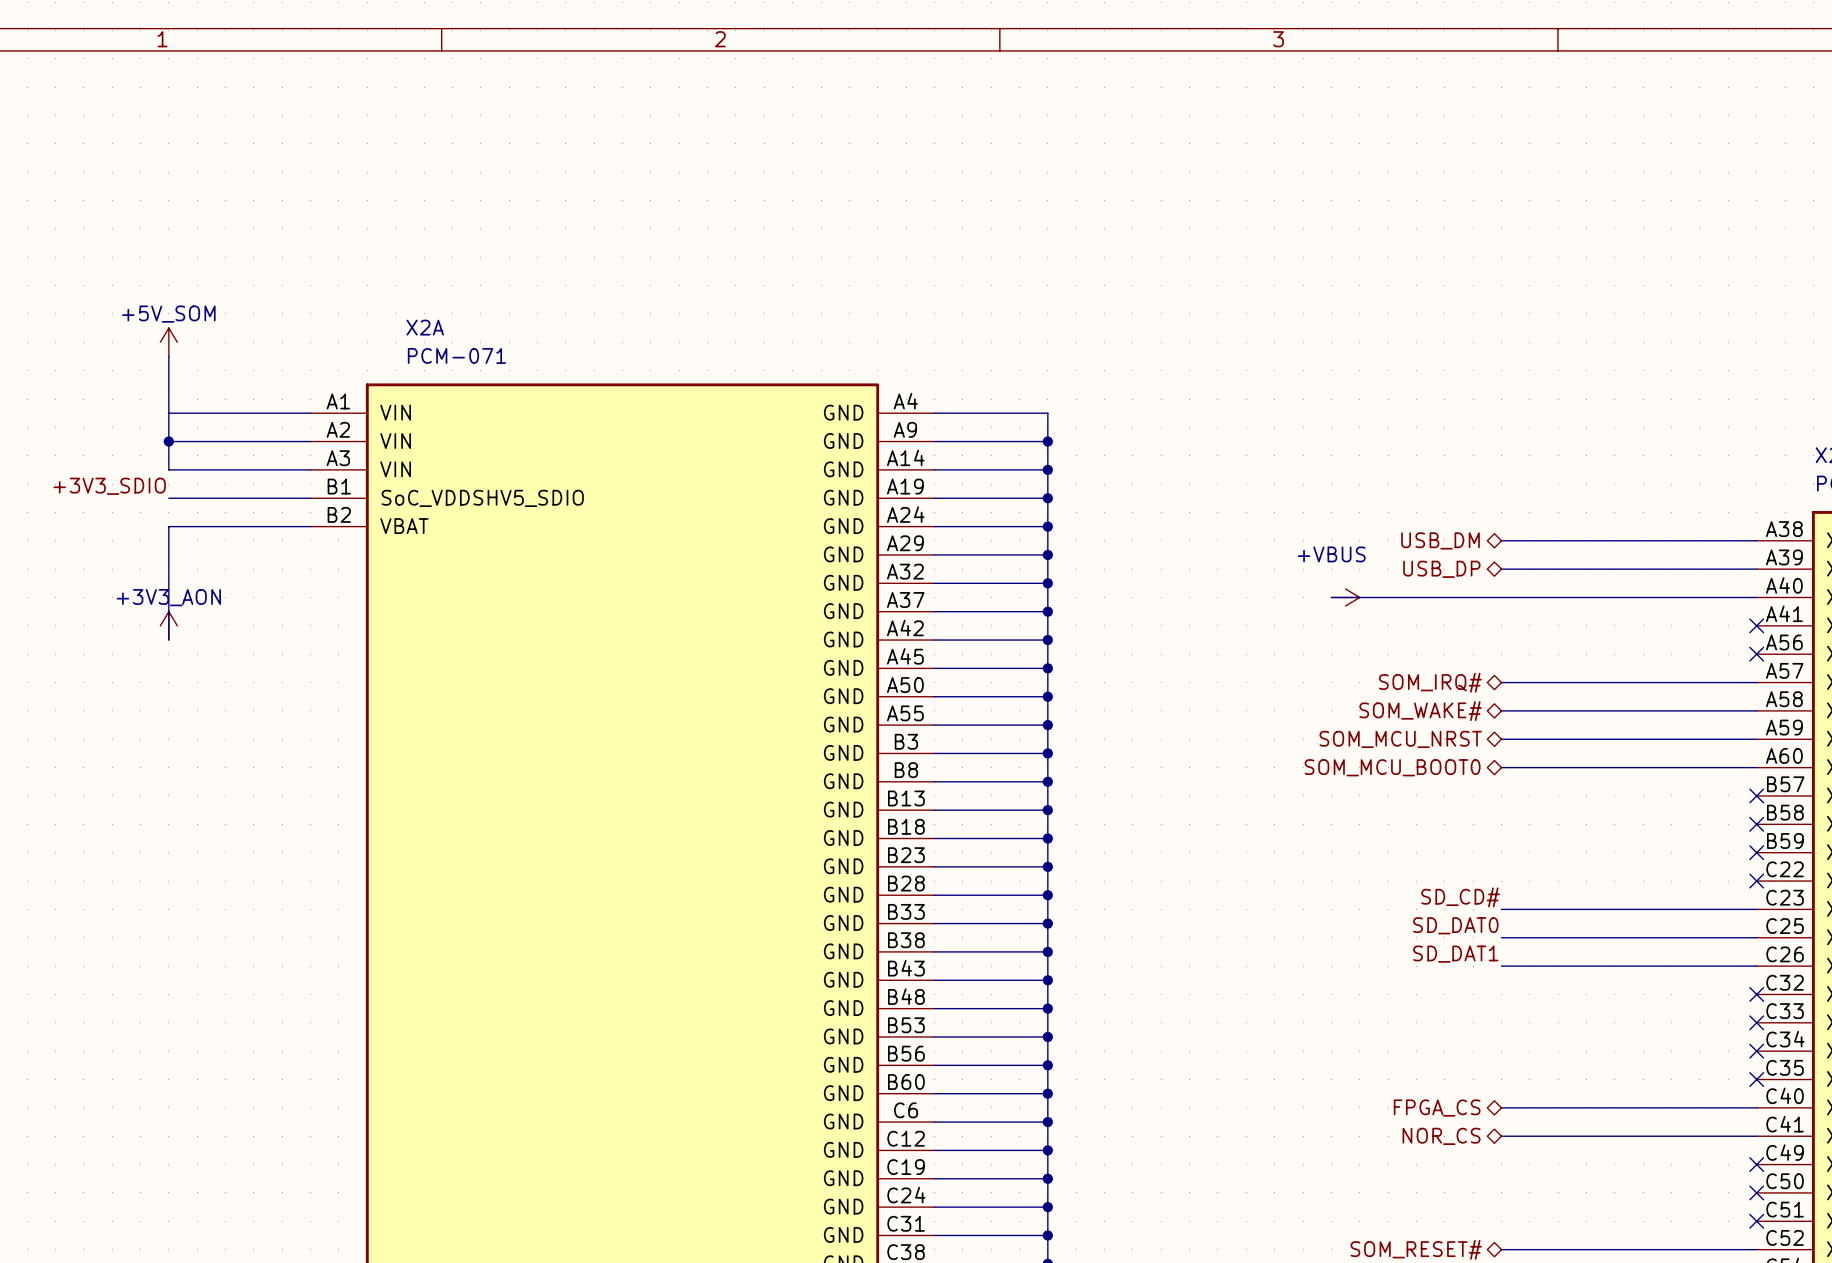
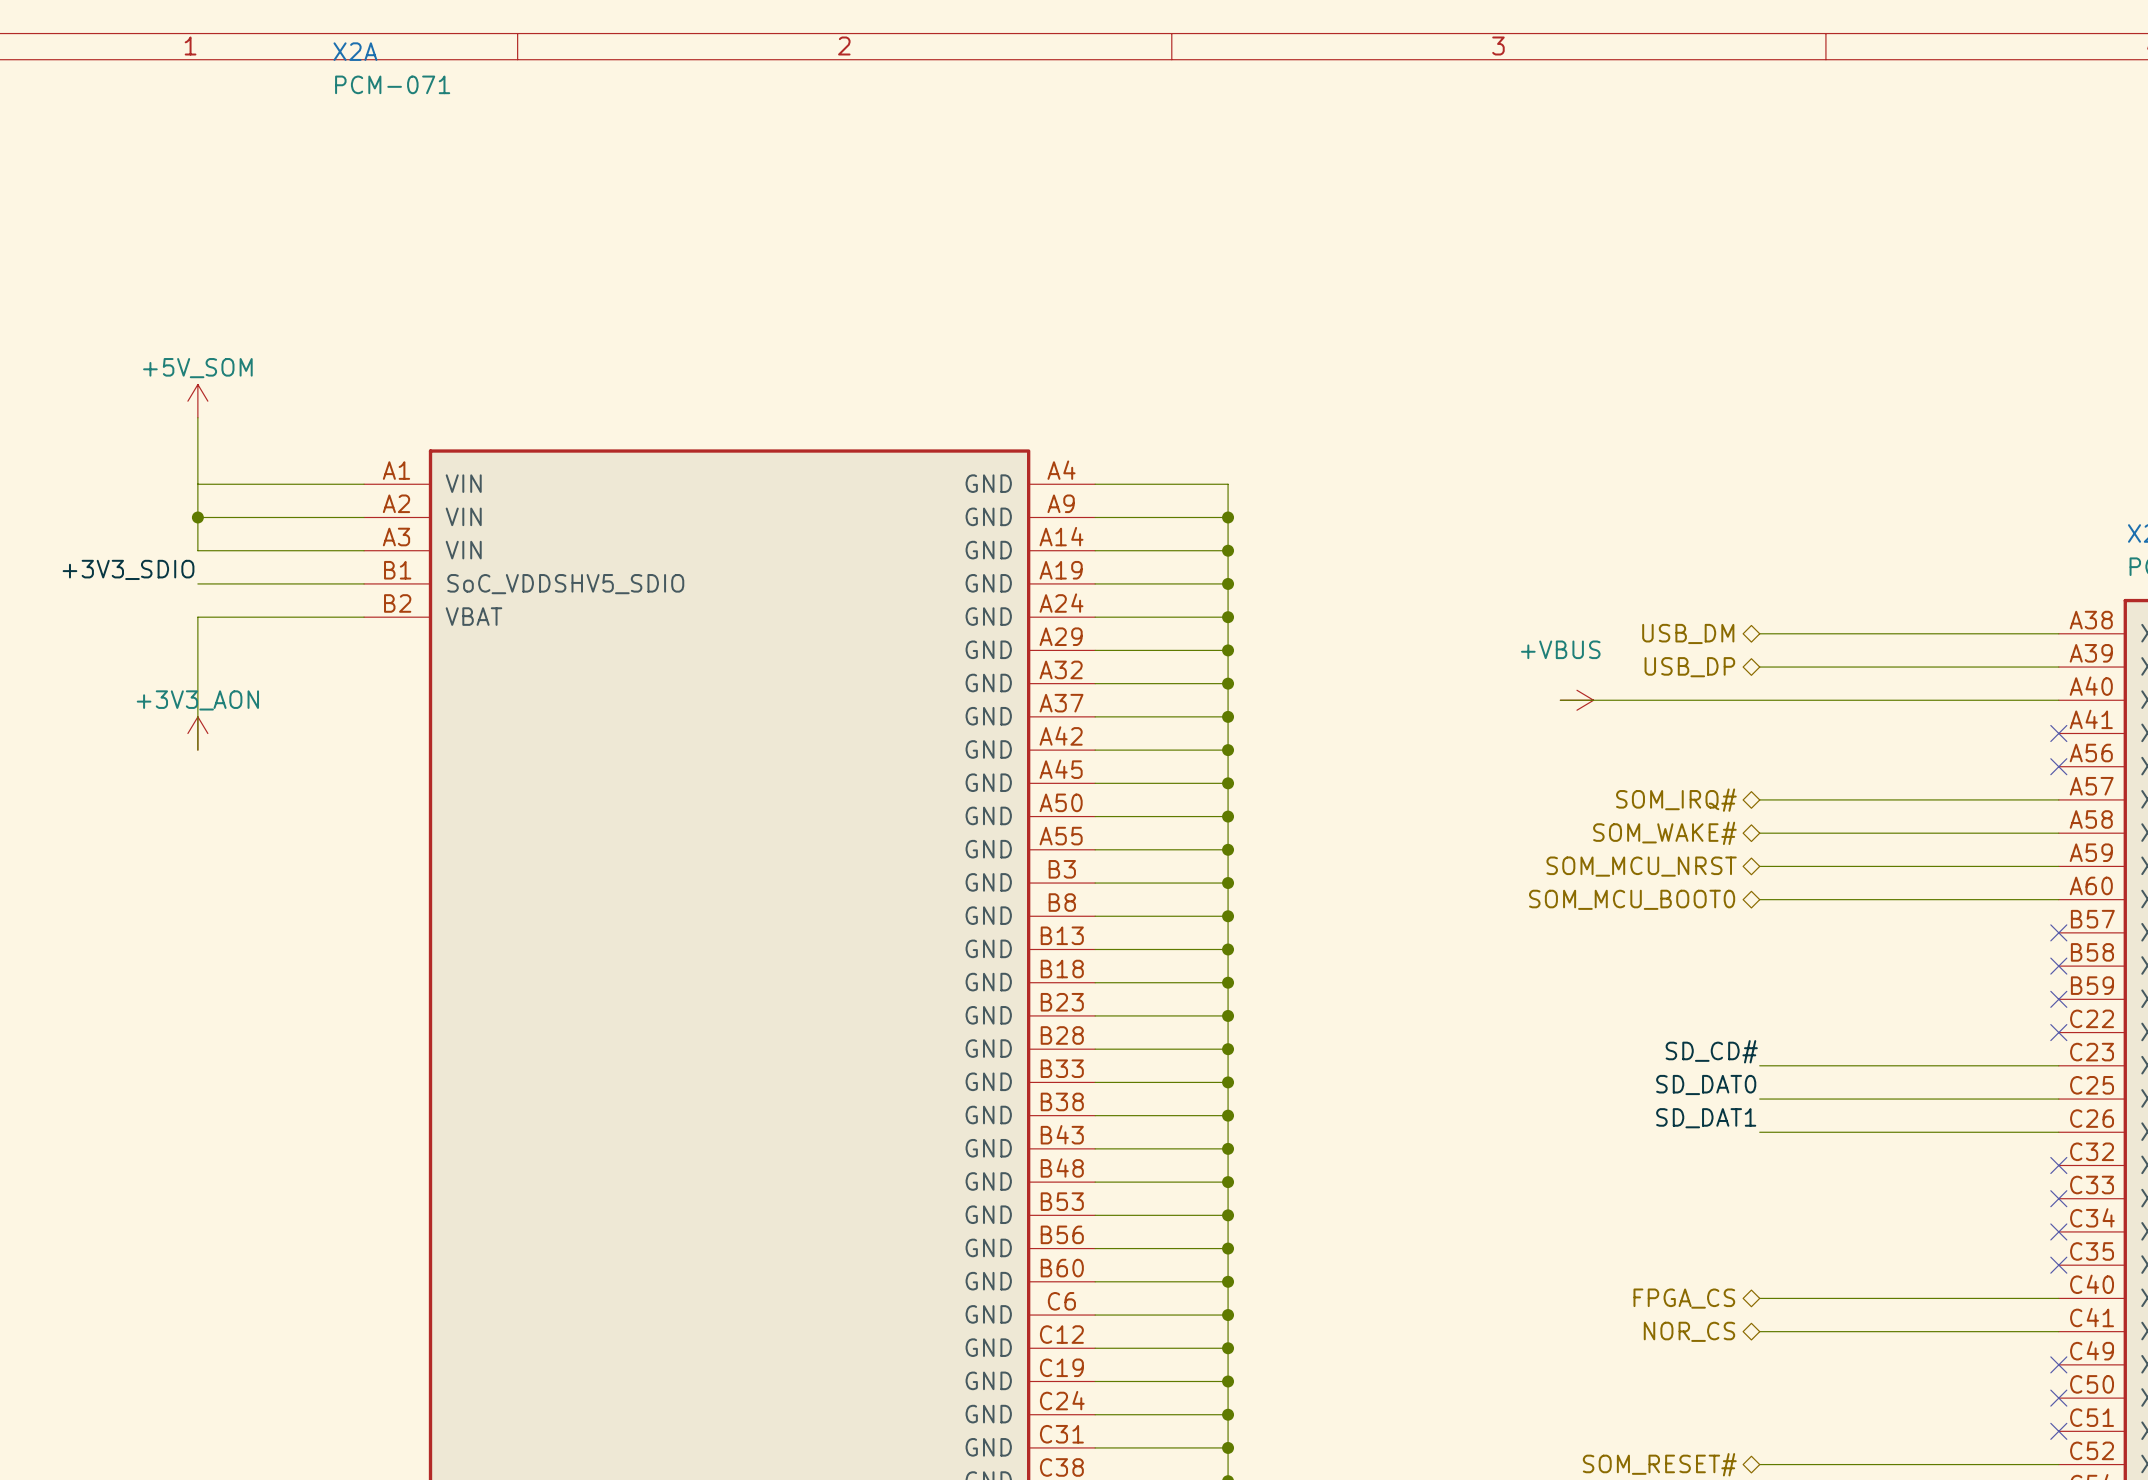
X2A name position: X2A (425, 327) -> X2A (355, 51)
X2A value position: PCM-071 (456, 355) -> PCM-071 (392, 84)

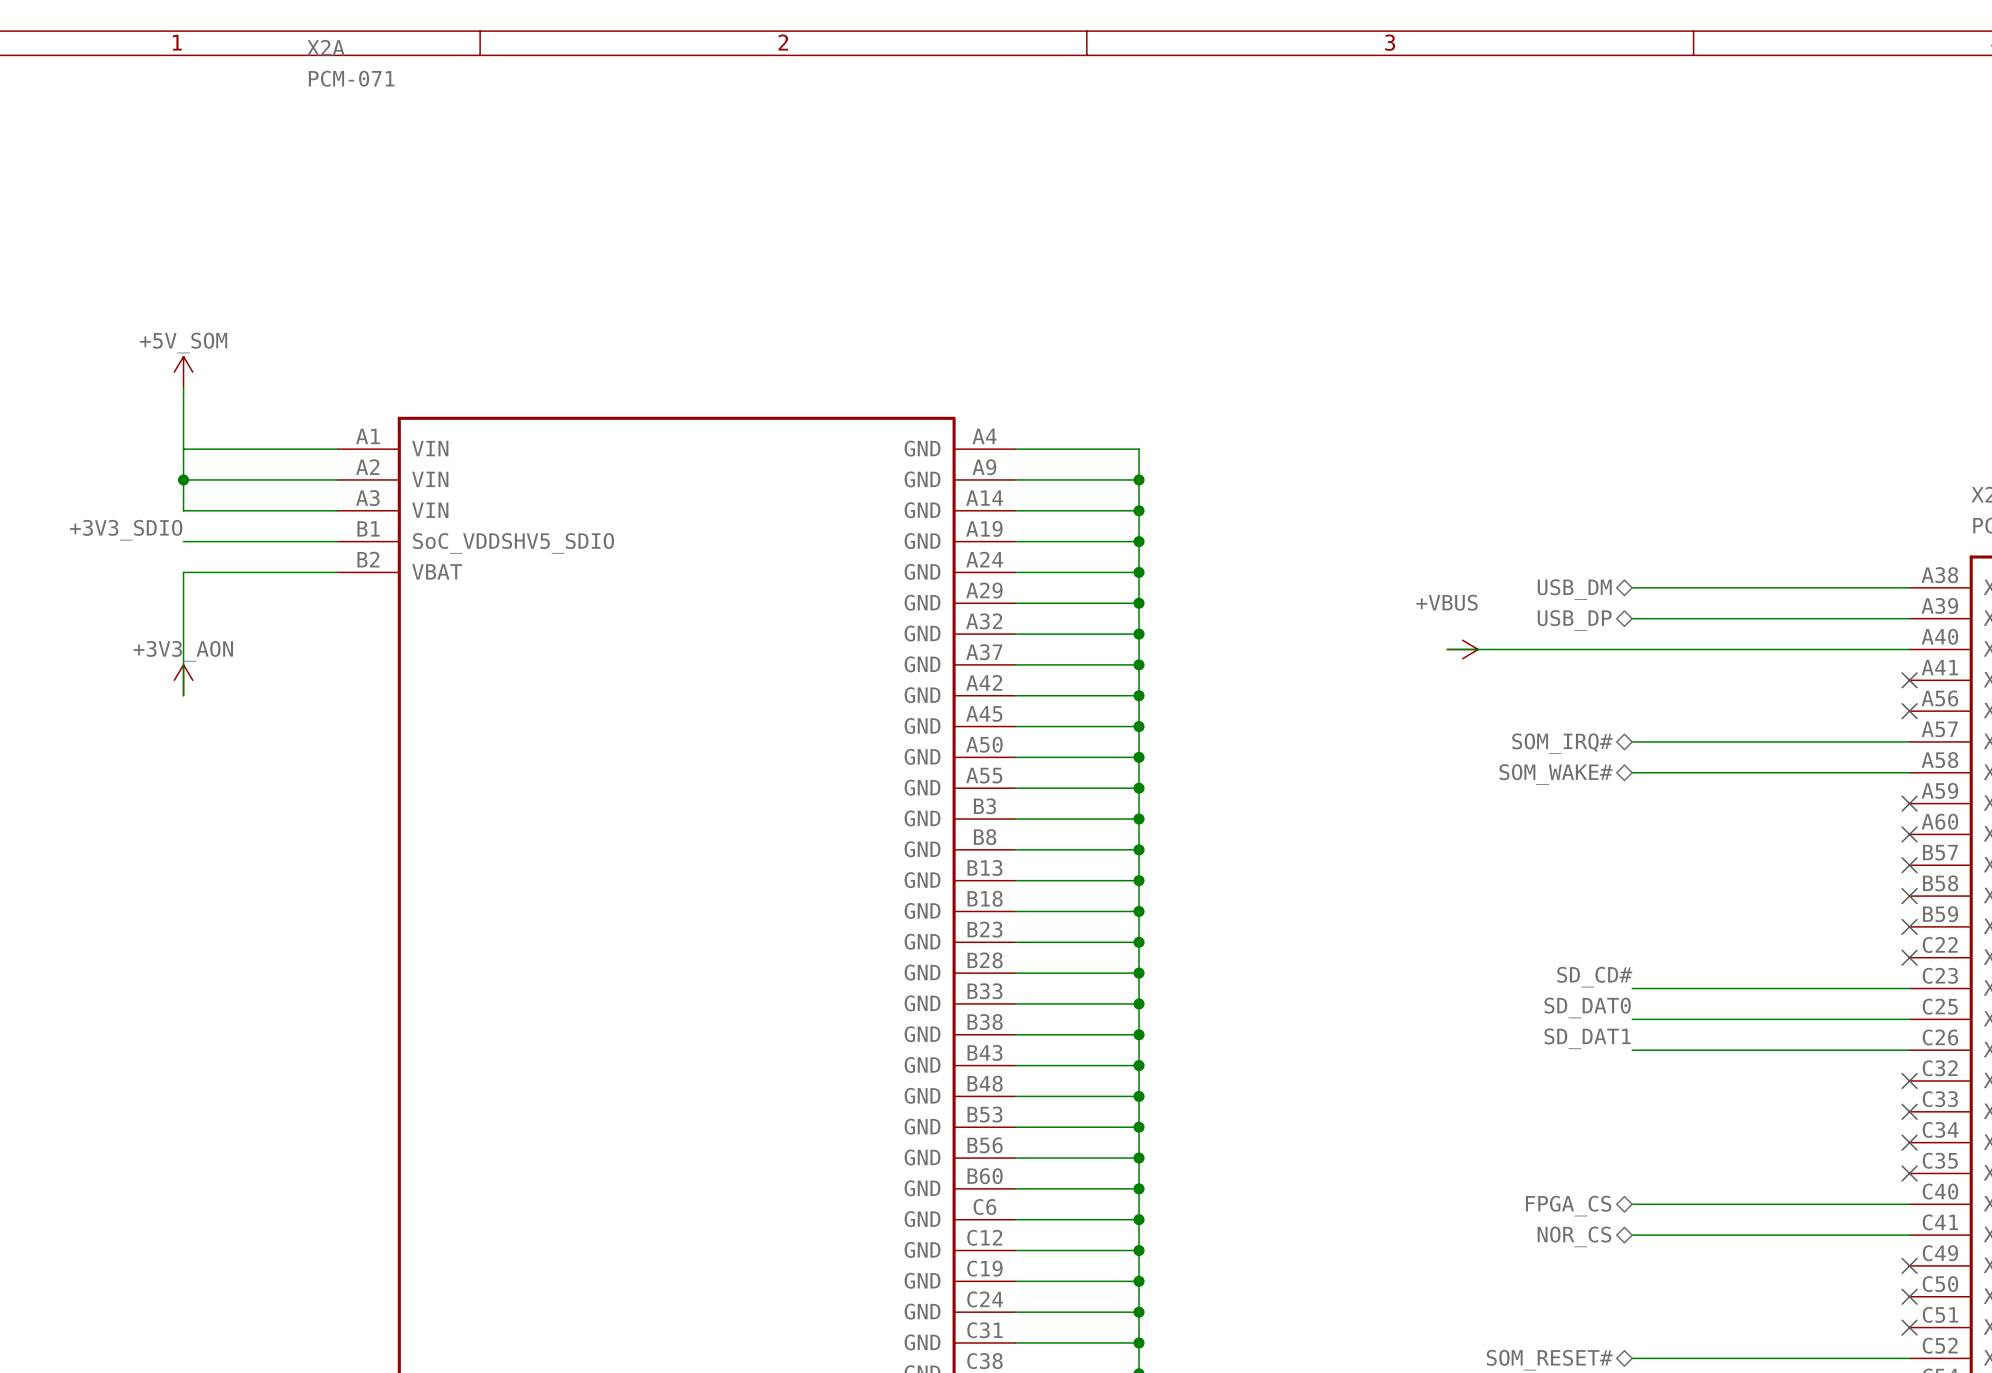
hierarchical label: SOM_MCU_NRST (1641, 866) -> none
wire: (1759, 866) (2058, 866) -> none
no-connect mark: none -> (1909, 803)
hierarchical label: SOM_MCU_BOOT0 (1632, 899) -> none
wire: (1759, 899) (2058, 899) -> none
no-connect mark: none -> (1909, 834)

